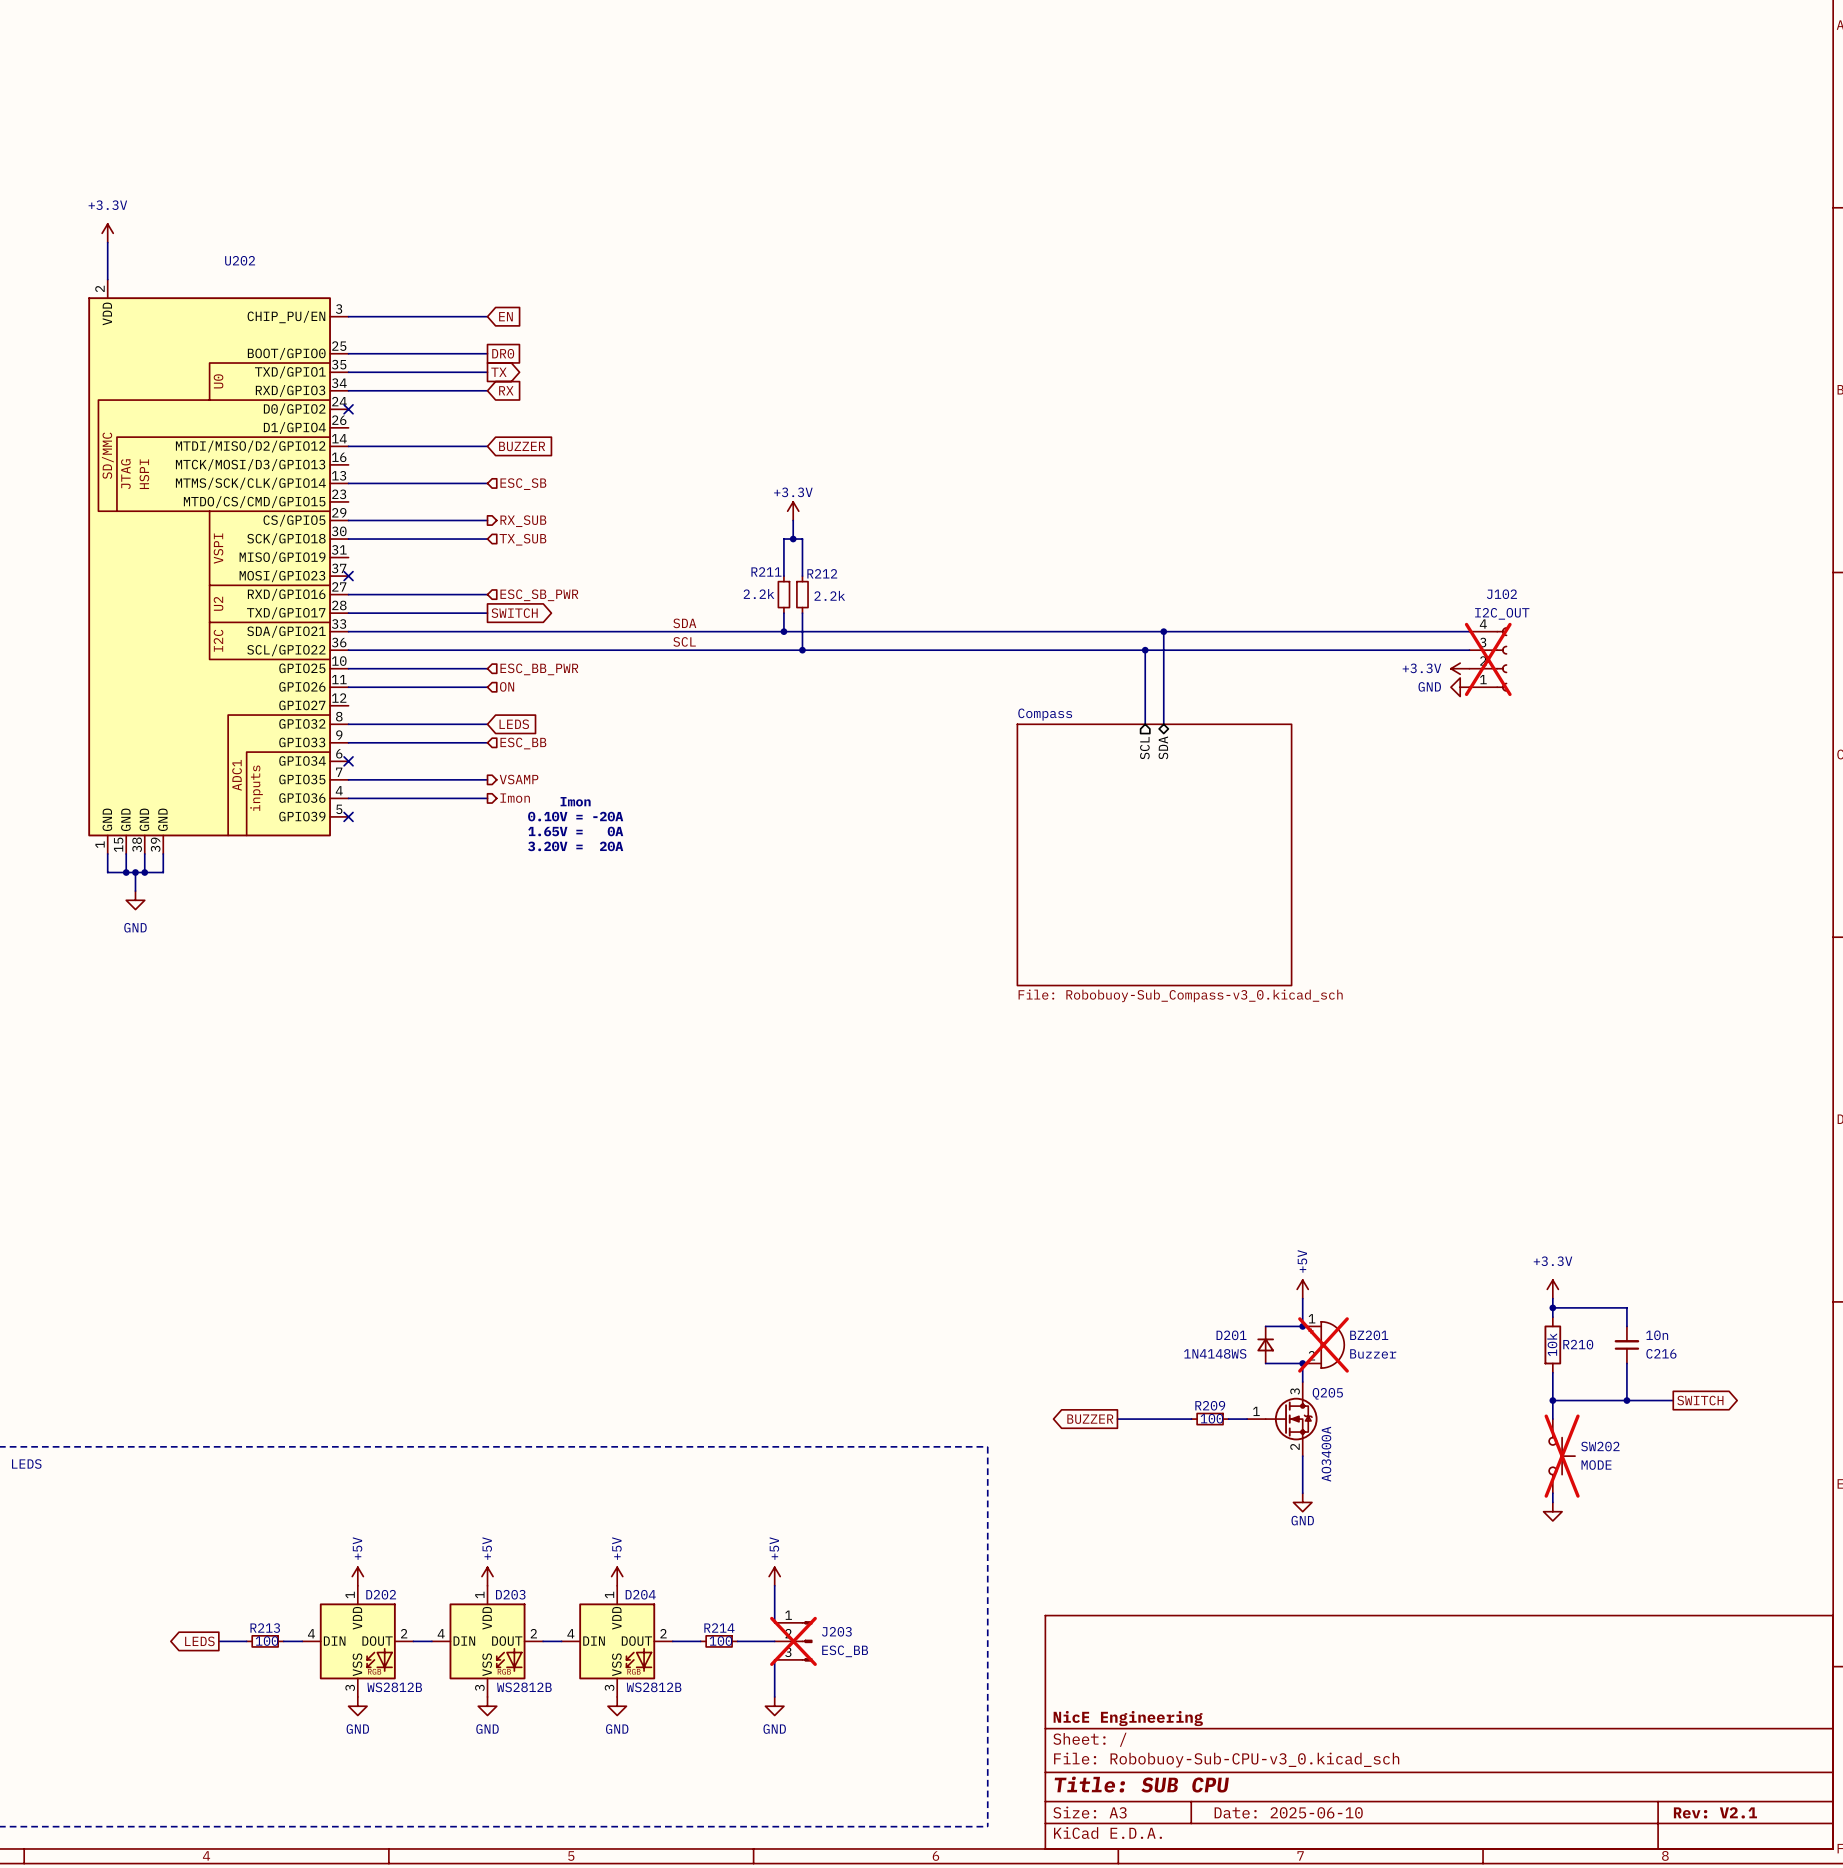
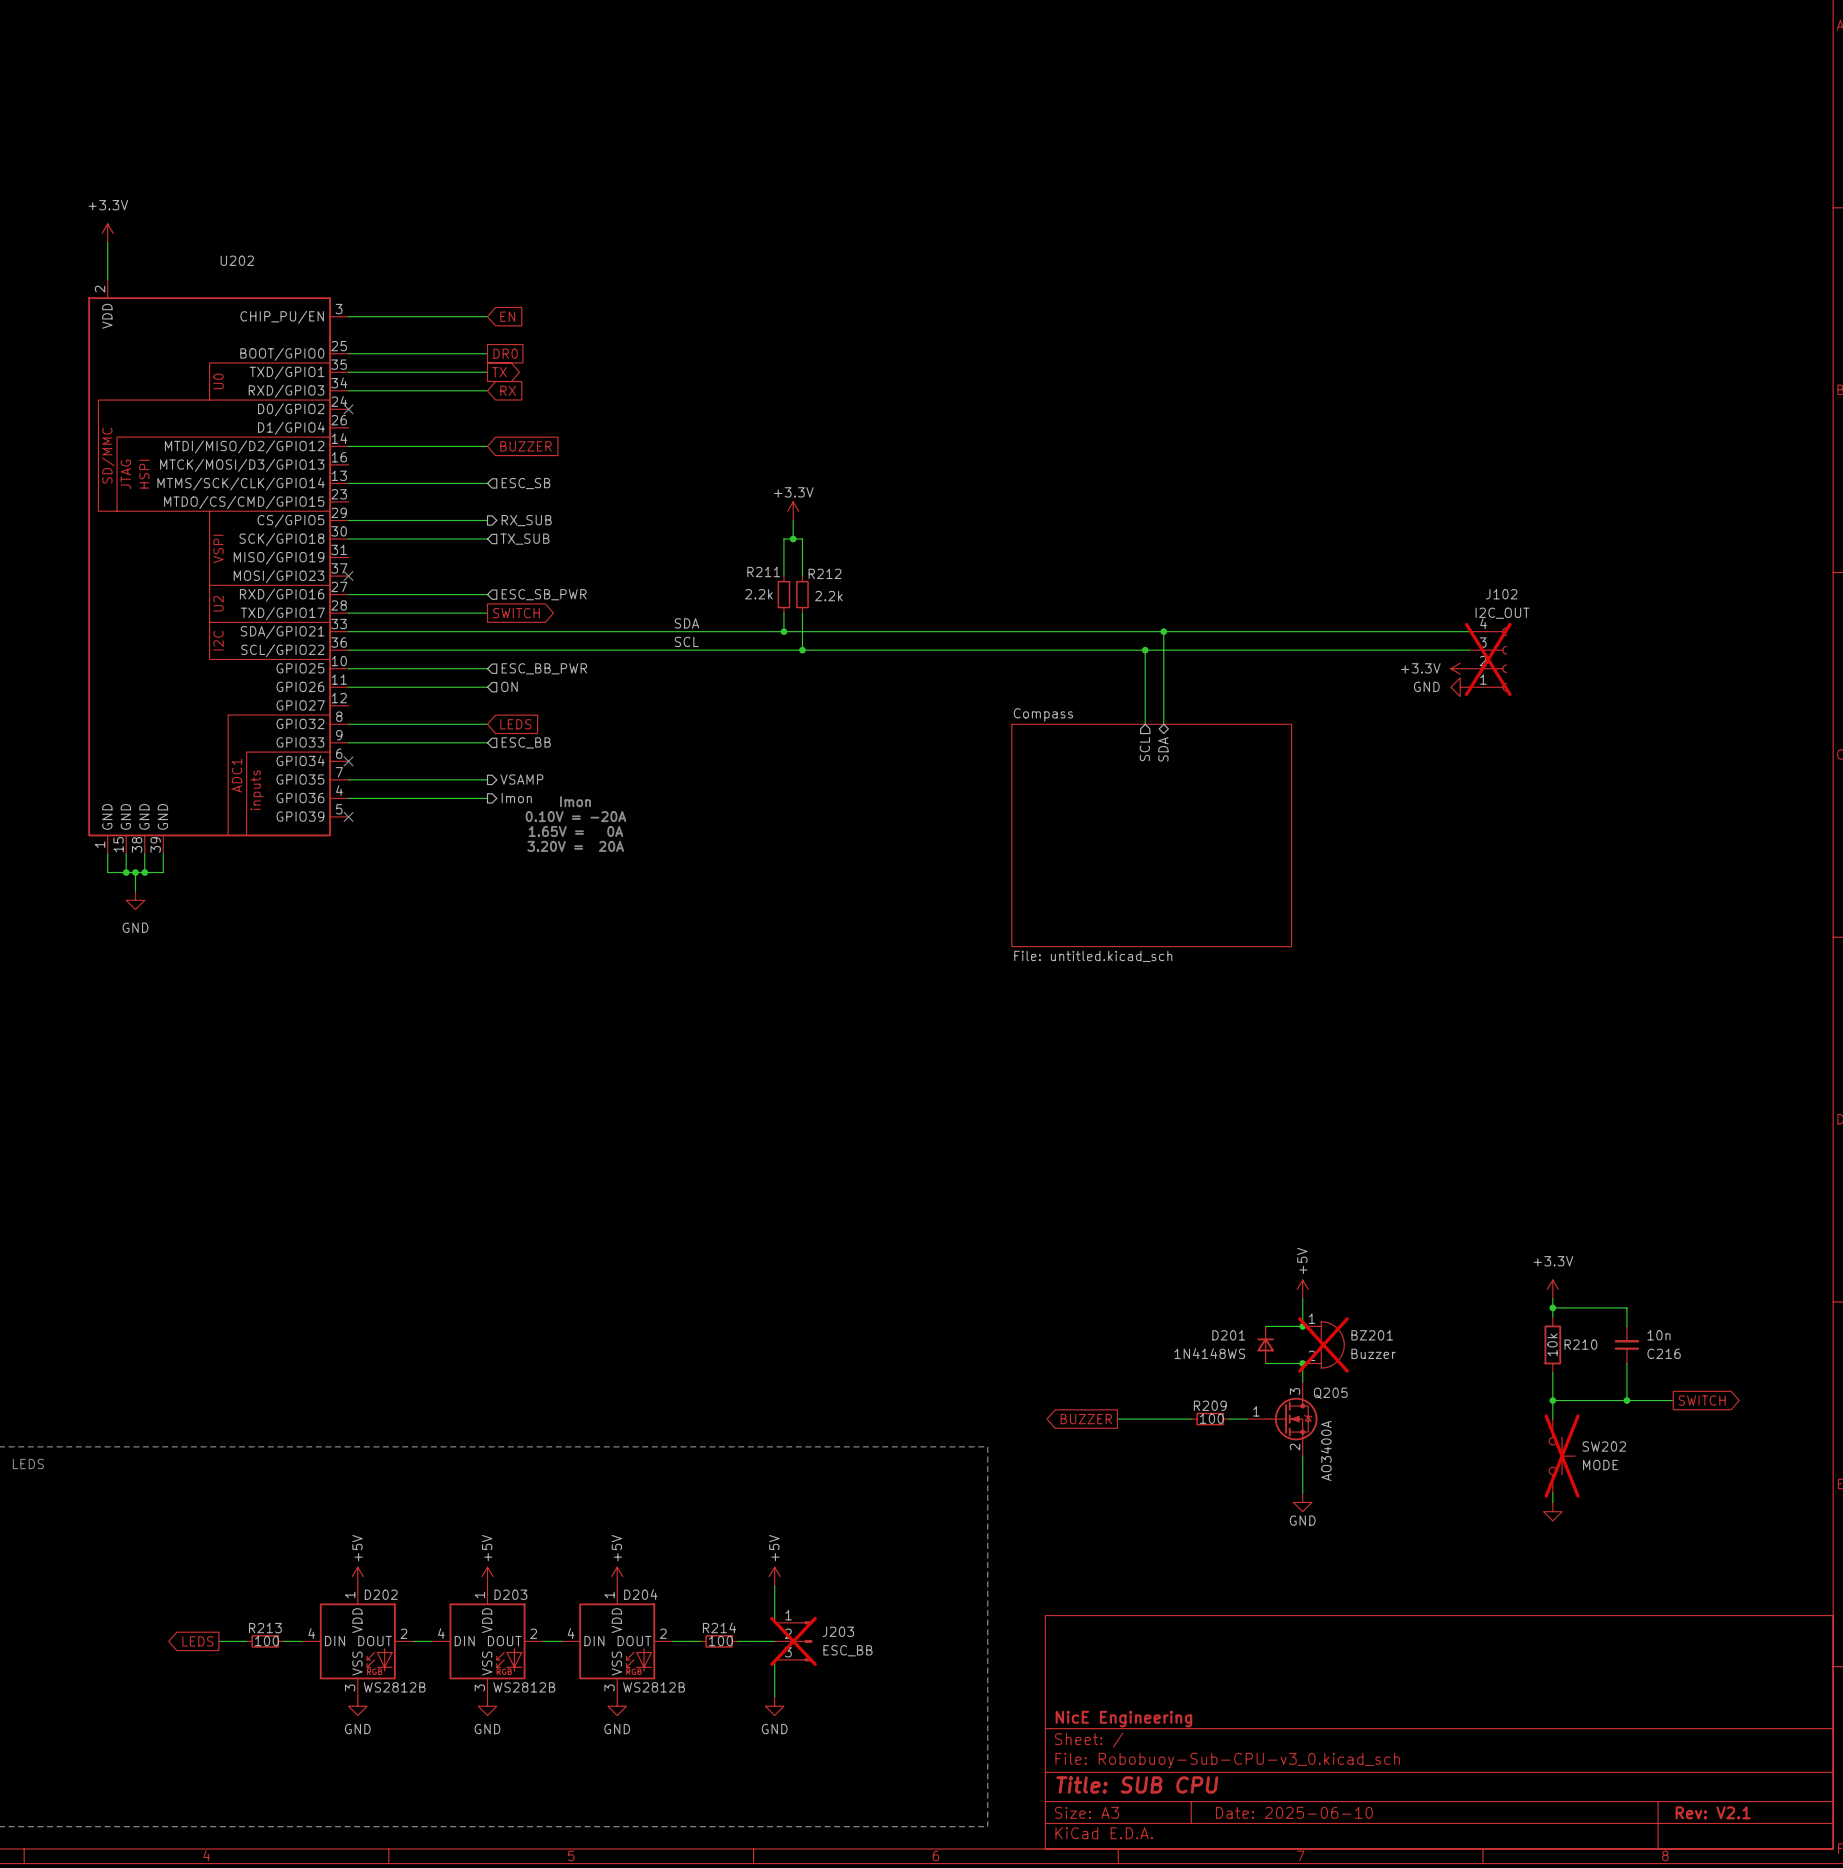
sheet Compass: none -> File: untitled.kicad_sch (1151, 835)
sheet Compass: File: Robobuoy-Sub_Compass-v3_0.kicad_sch (1154, 854) -> none

